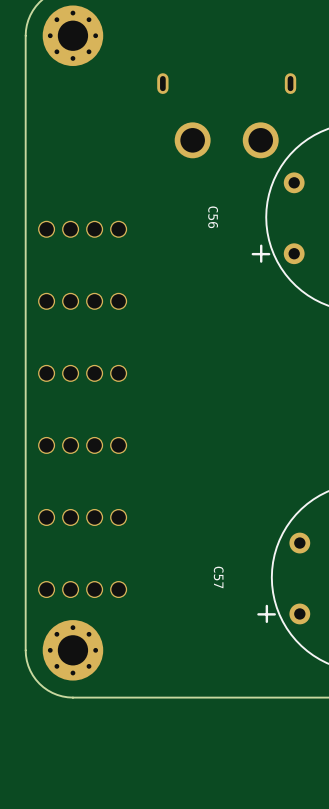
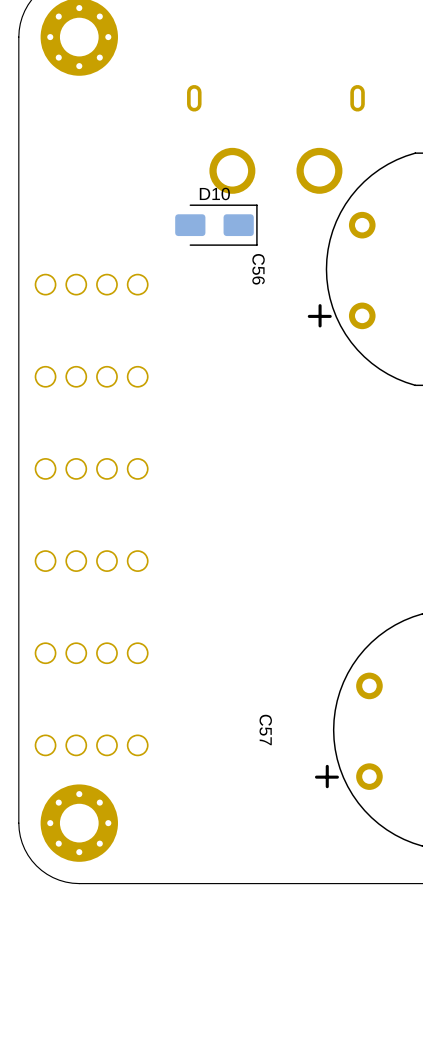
D10: none -> (216, 225)

